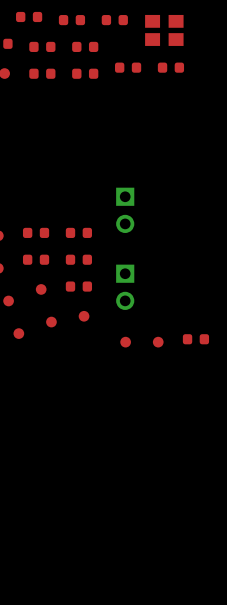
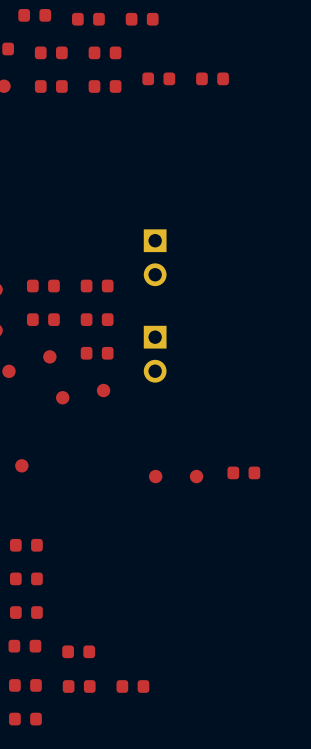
part: (164, 30) -> none
part position: (18, 333) -> (21, 465)
part position: (195, 339) -> (243, 472)
part: (125, 342) -> none
part: (158, 342) -> none
part: none -> (155, 476)
part: none -> (196, 476)
part: none -> (26, 545)
part: none -> (26, 578)
part: none -> (26, 612)
part: none -> (24, 646)
part: none -> (78, 651)
part: none -> (25, 685)
part: none -> (79, 686)
part: none -> (132, 686)
part: none -> (25, 719)

